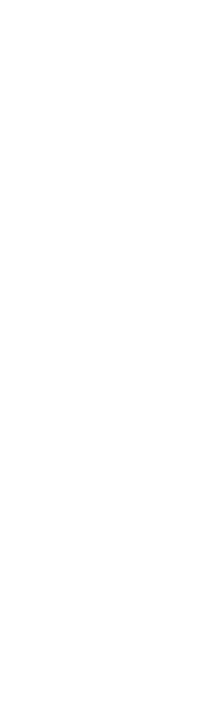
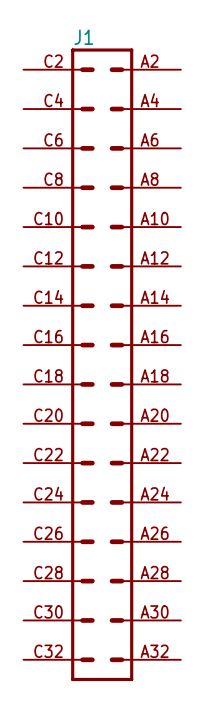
J1: none -> (102, 364)

